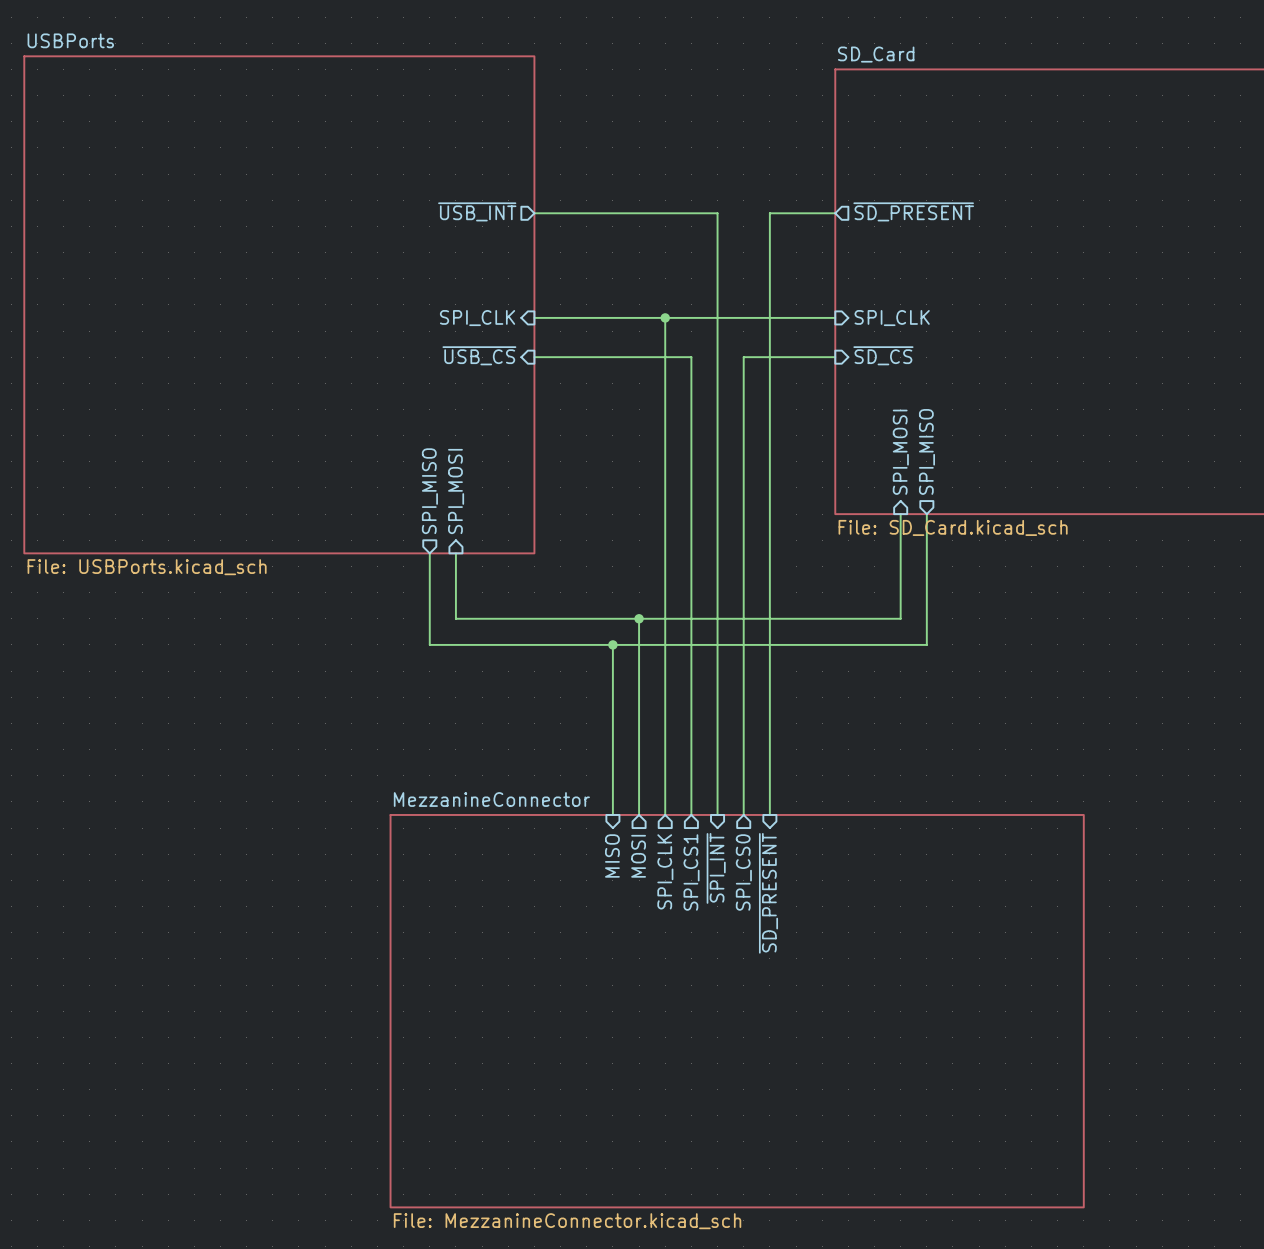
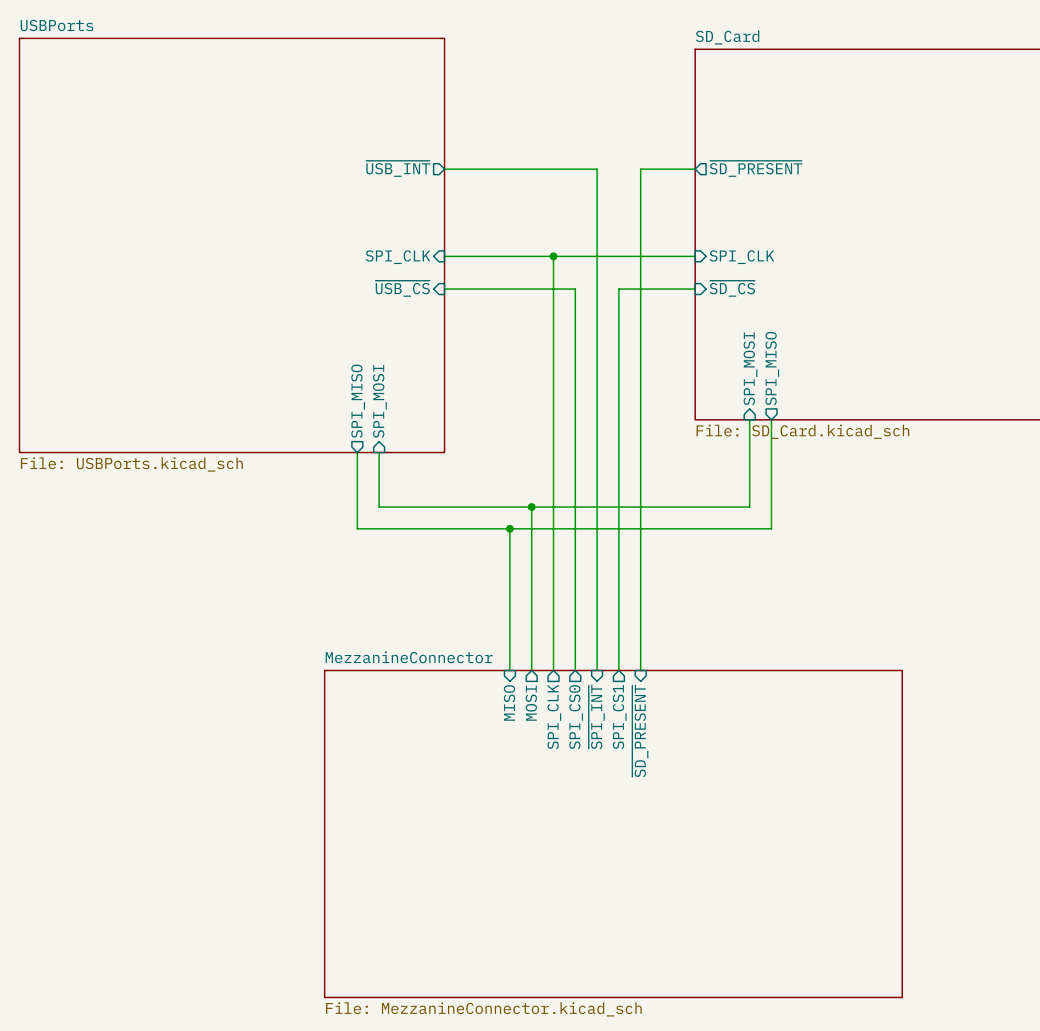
sheet pin: SPI_CS1 (691, 872) -> SPI_CS0 (576, 717)
sheet pin: SPI_CS0 (743, 872) -> SPI_CS1 (619, 717)

